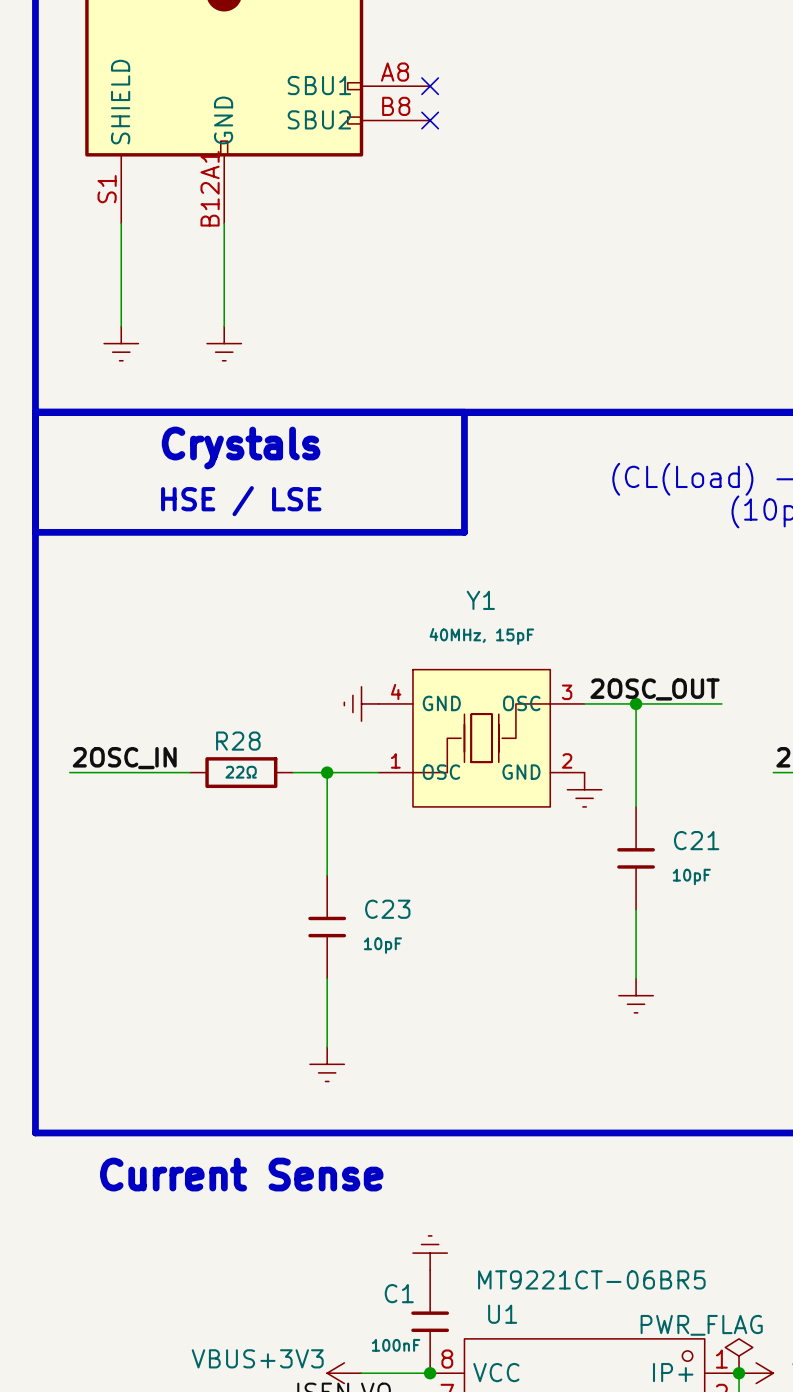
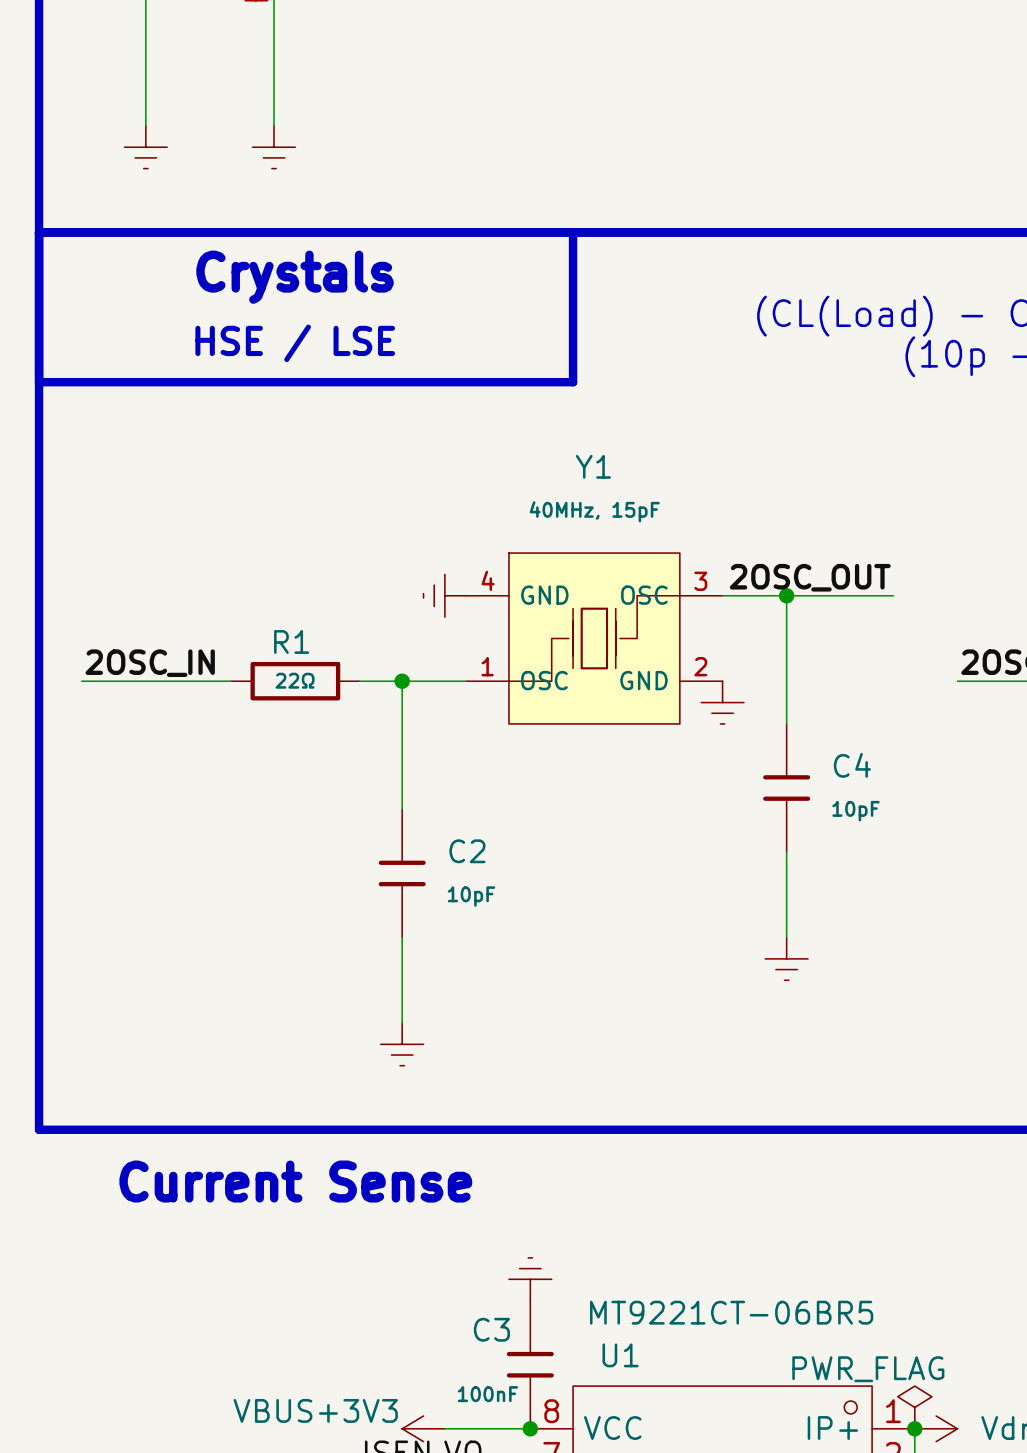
R28 name: R28 (238, 741) -> R1 (291, 641)
C21 name: C21 (696, 840) -> C4 (852, 765)
C23 name: C23 (387, 909) -> C2 (467, 851)
C1 name: C1 (399, 1293) -> C3 (491, 1329)

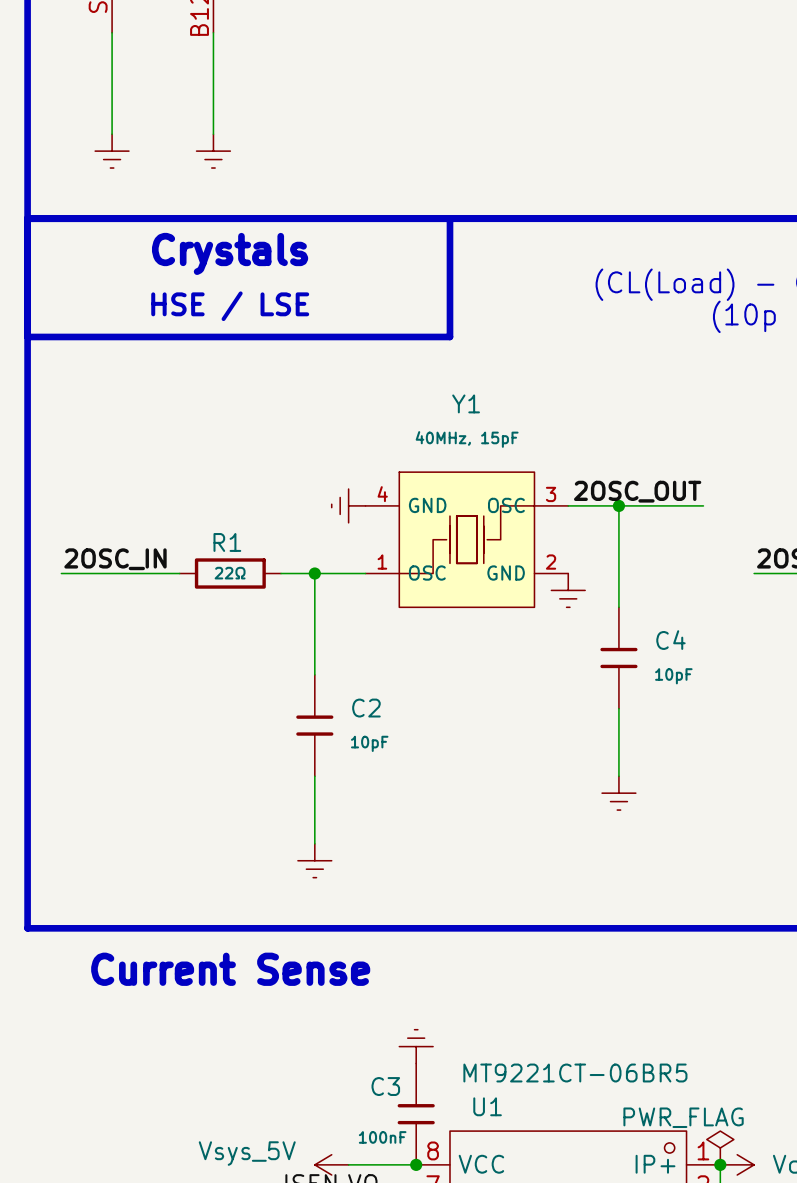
power symbol: VBUS+3V3 (423, 1428) -> Vsys_5V (331, 1164)

